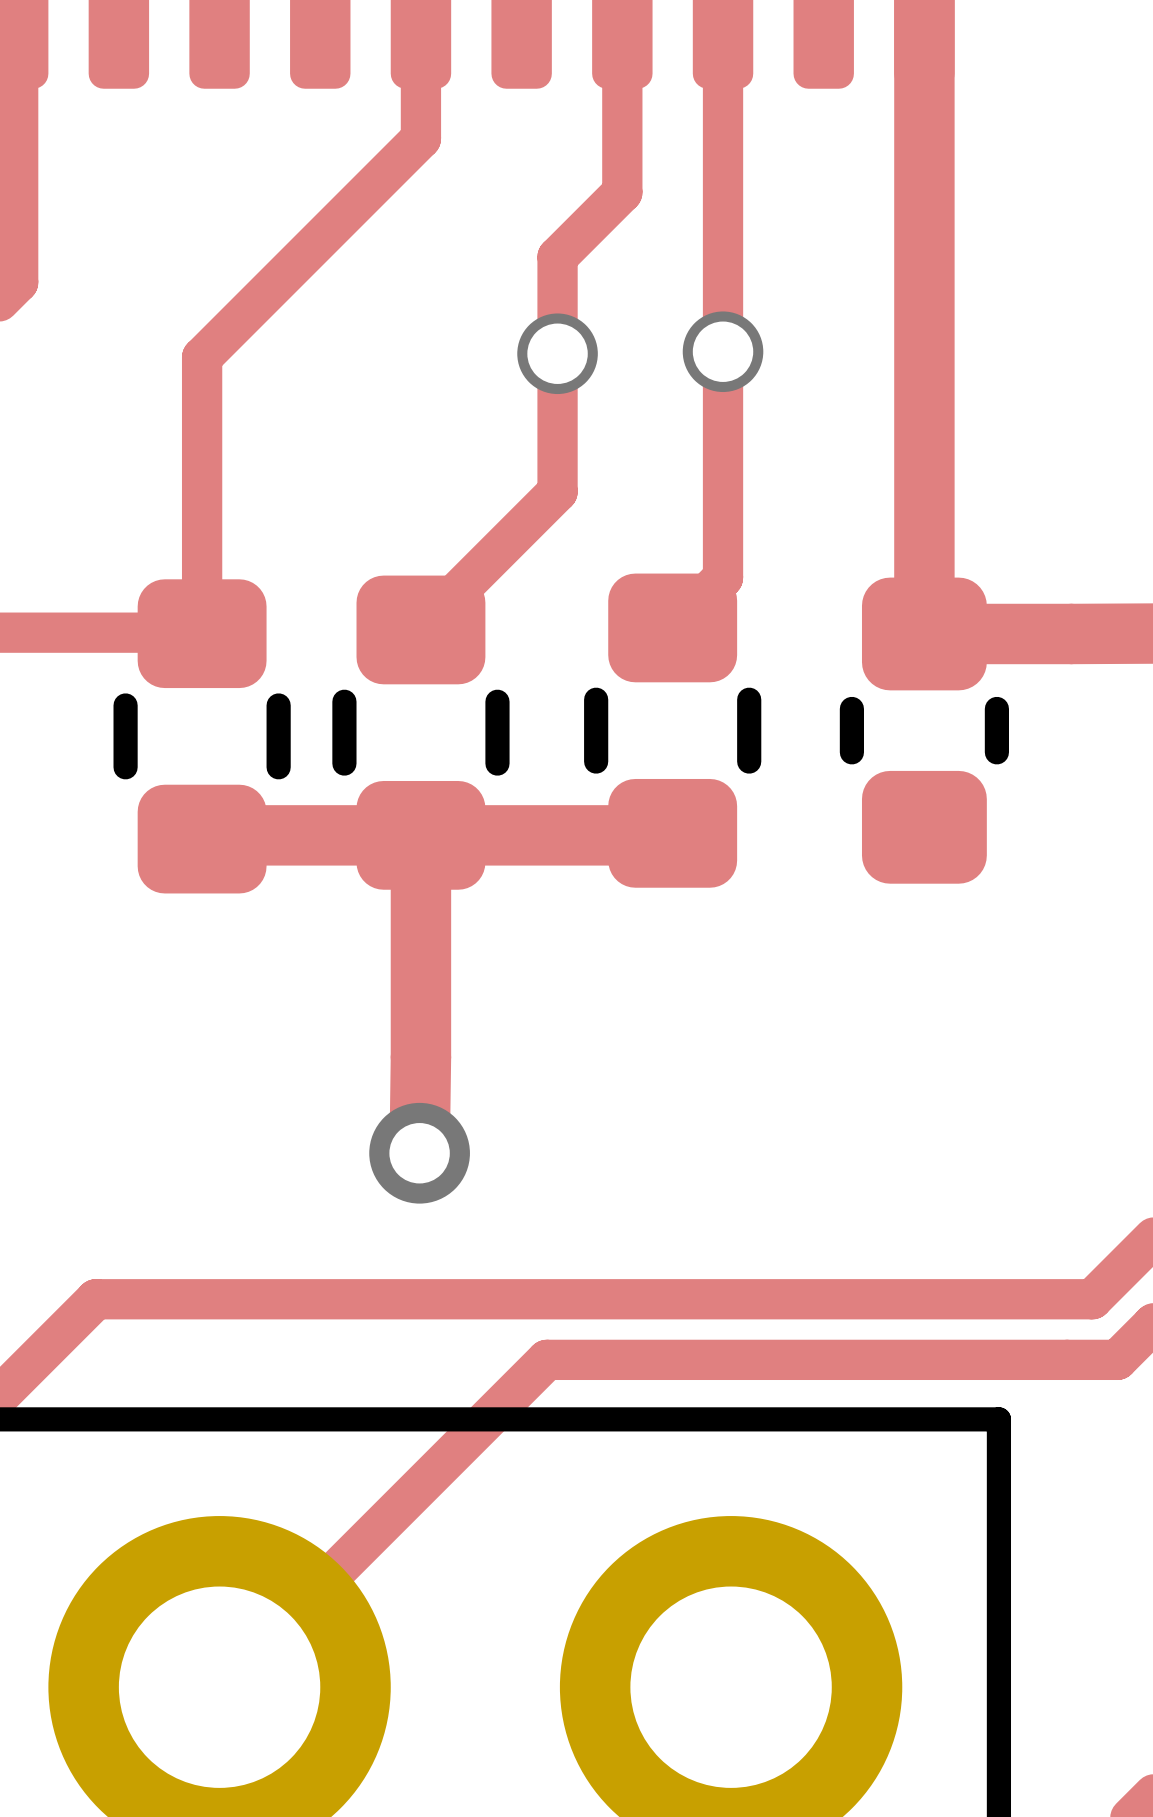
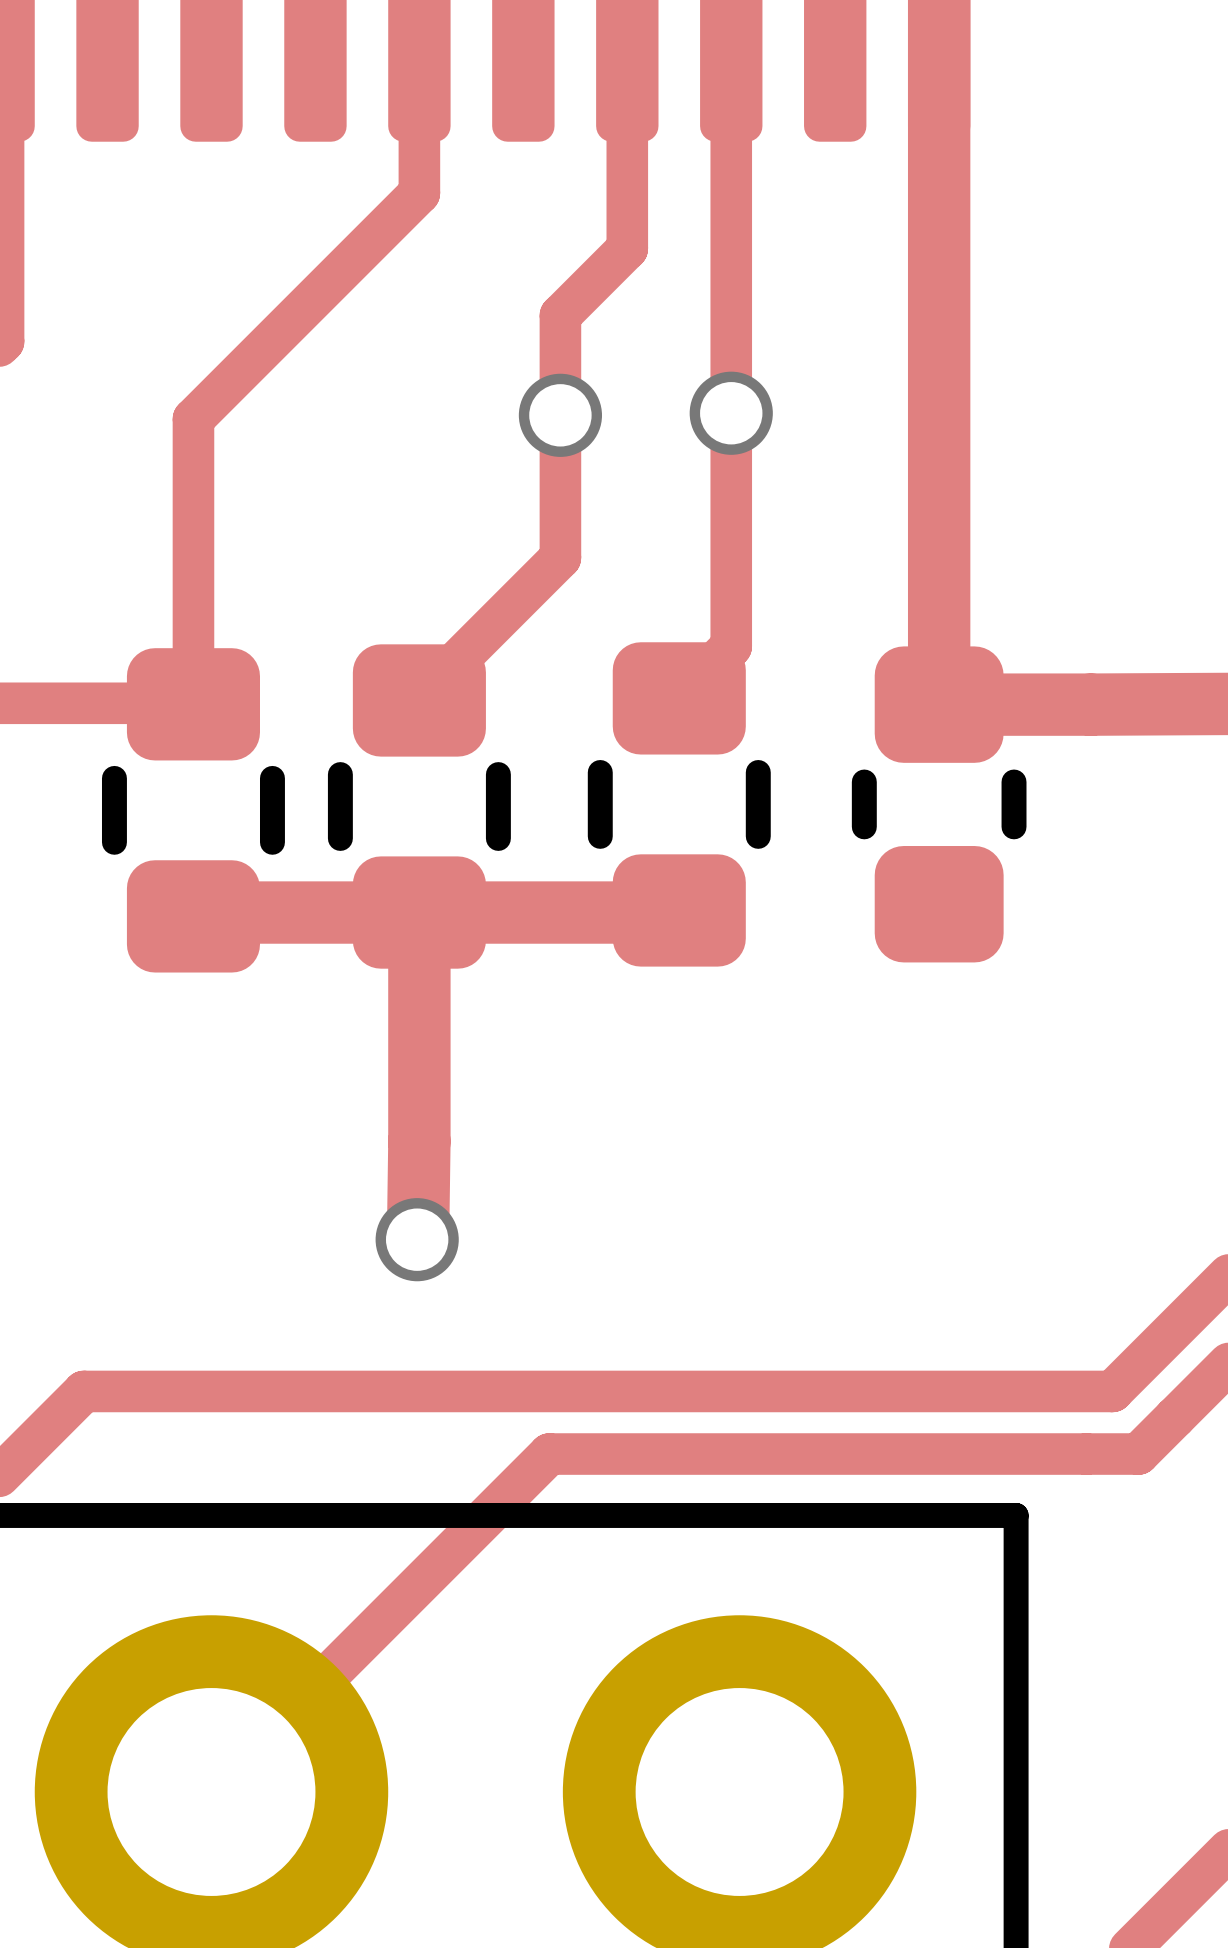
via size: [369, 1102, 470, 1204] -> [375, 1198, 459, 1282]

